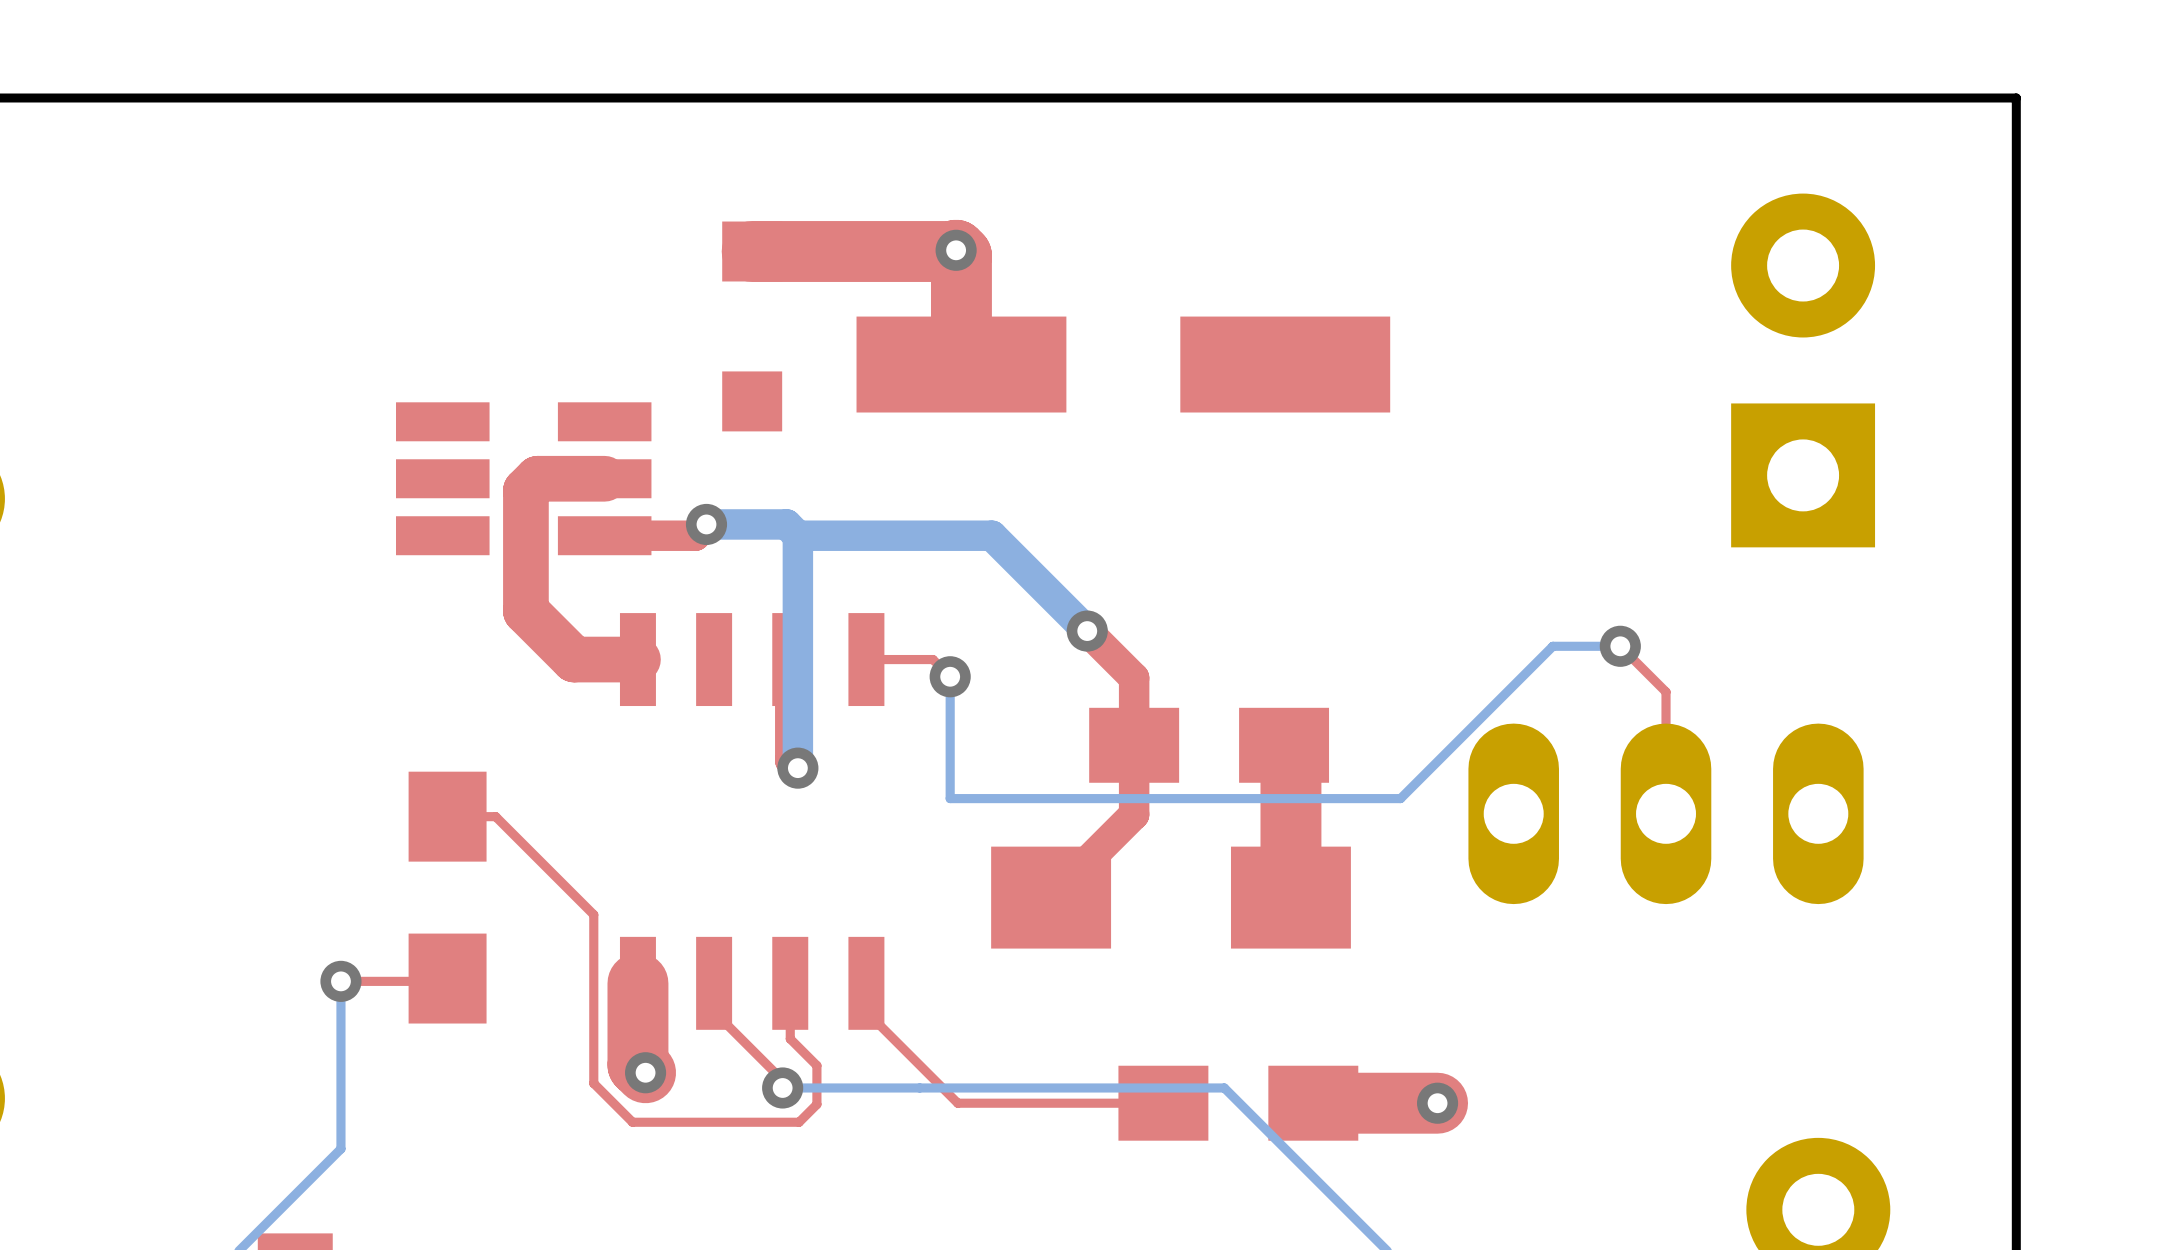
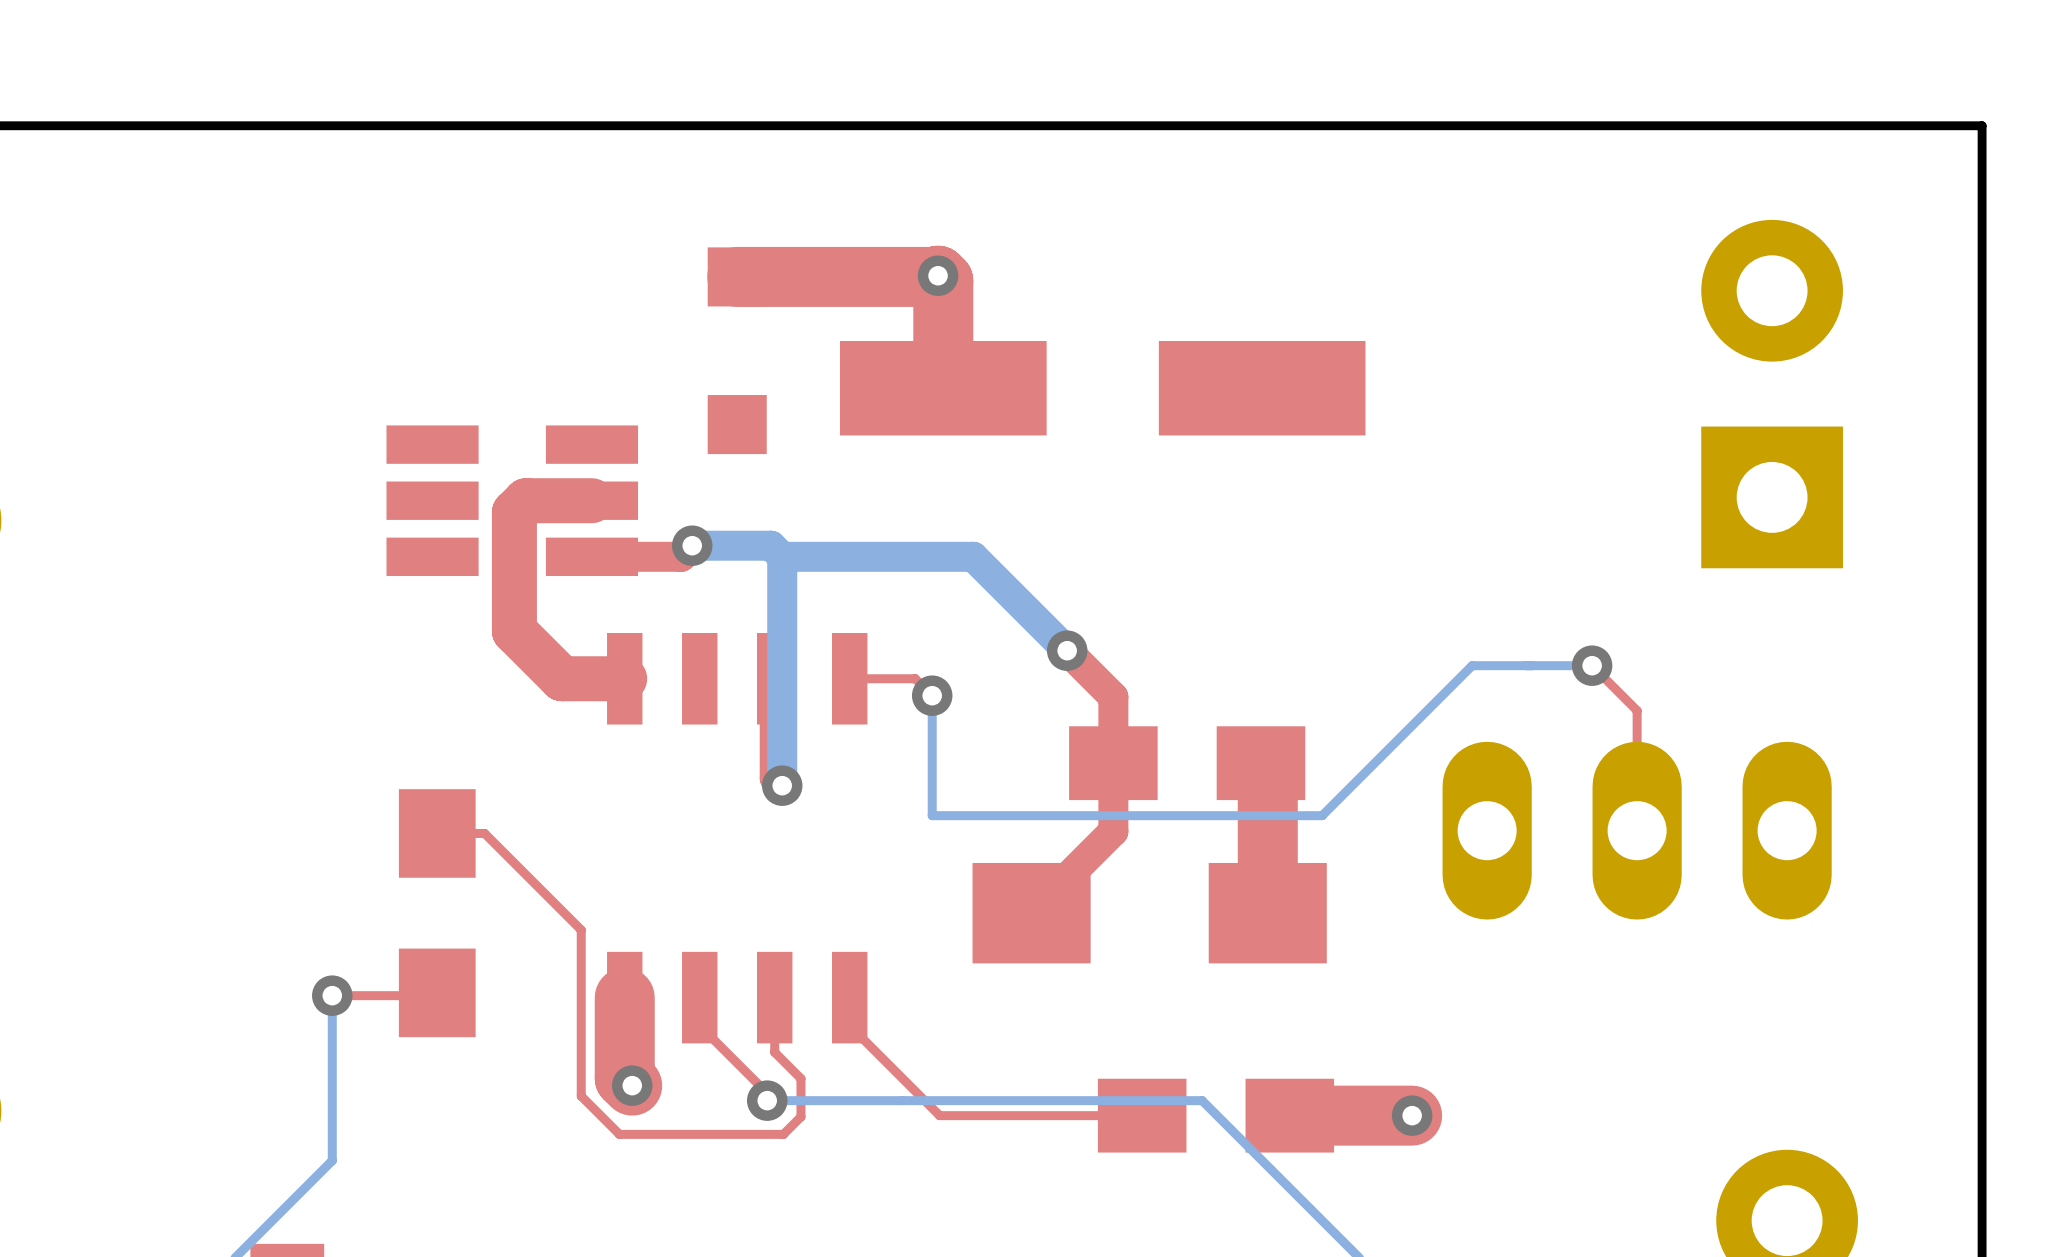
bottom track: (1552, 646) (1400, 798) (1346, 798) -> (1525, 665) (1472, 665) (1322, 815)

